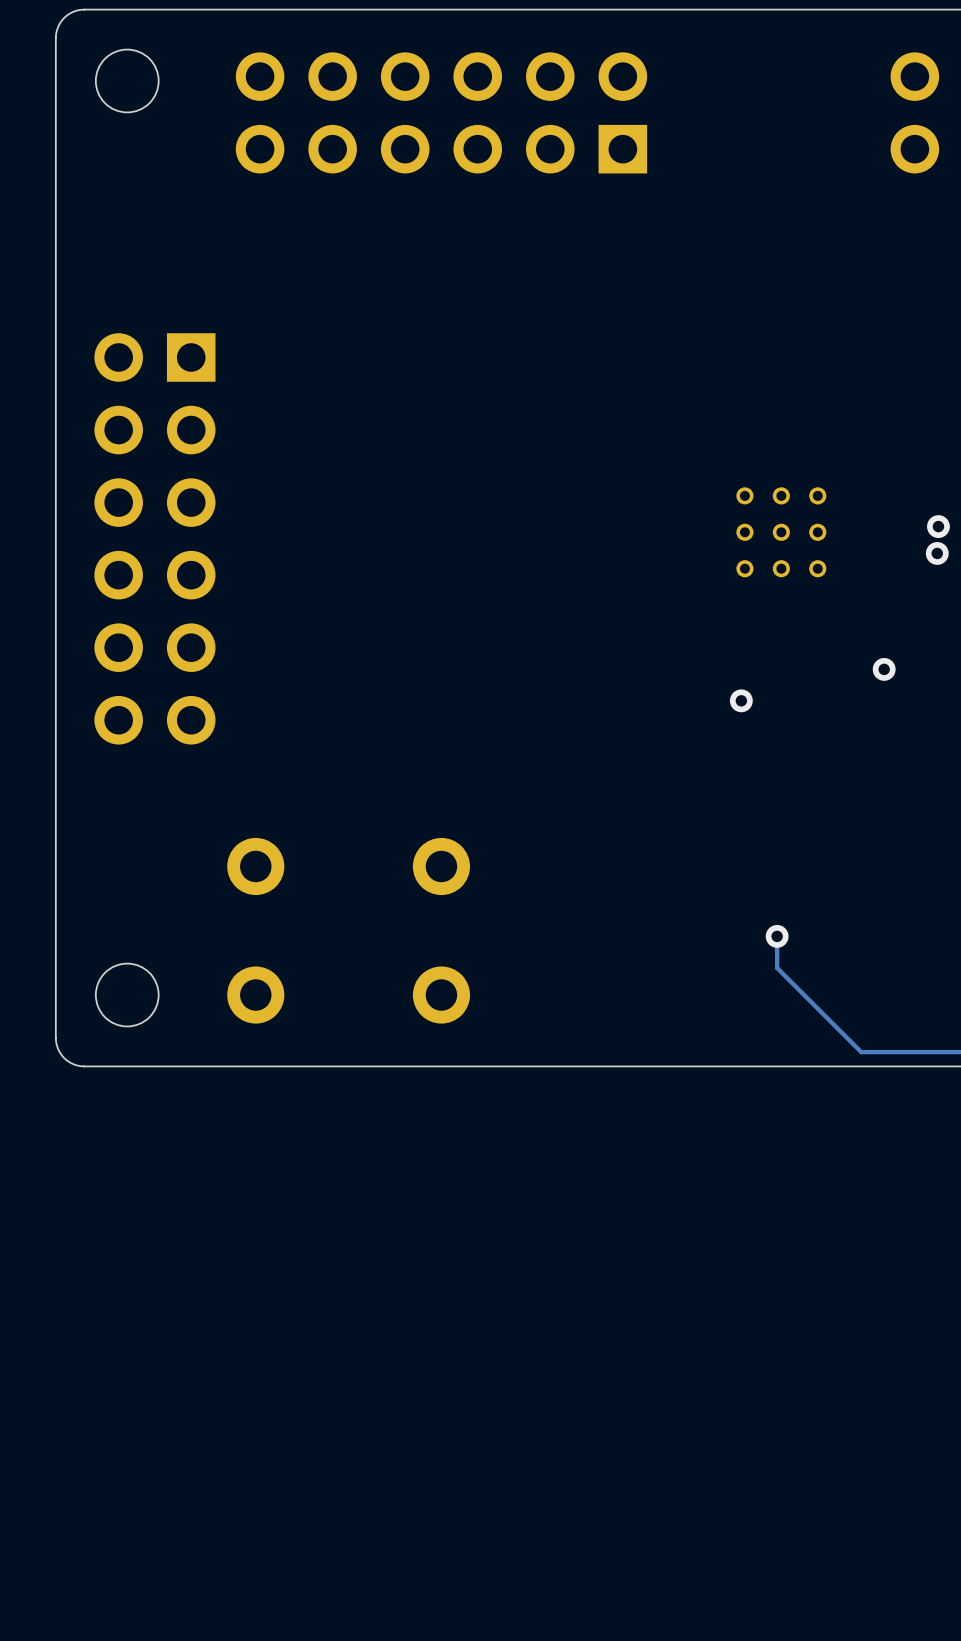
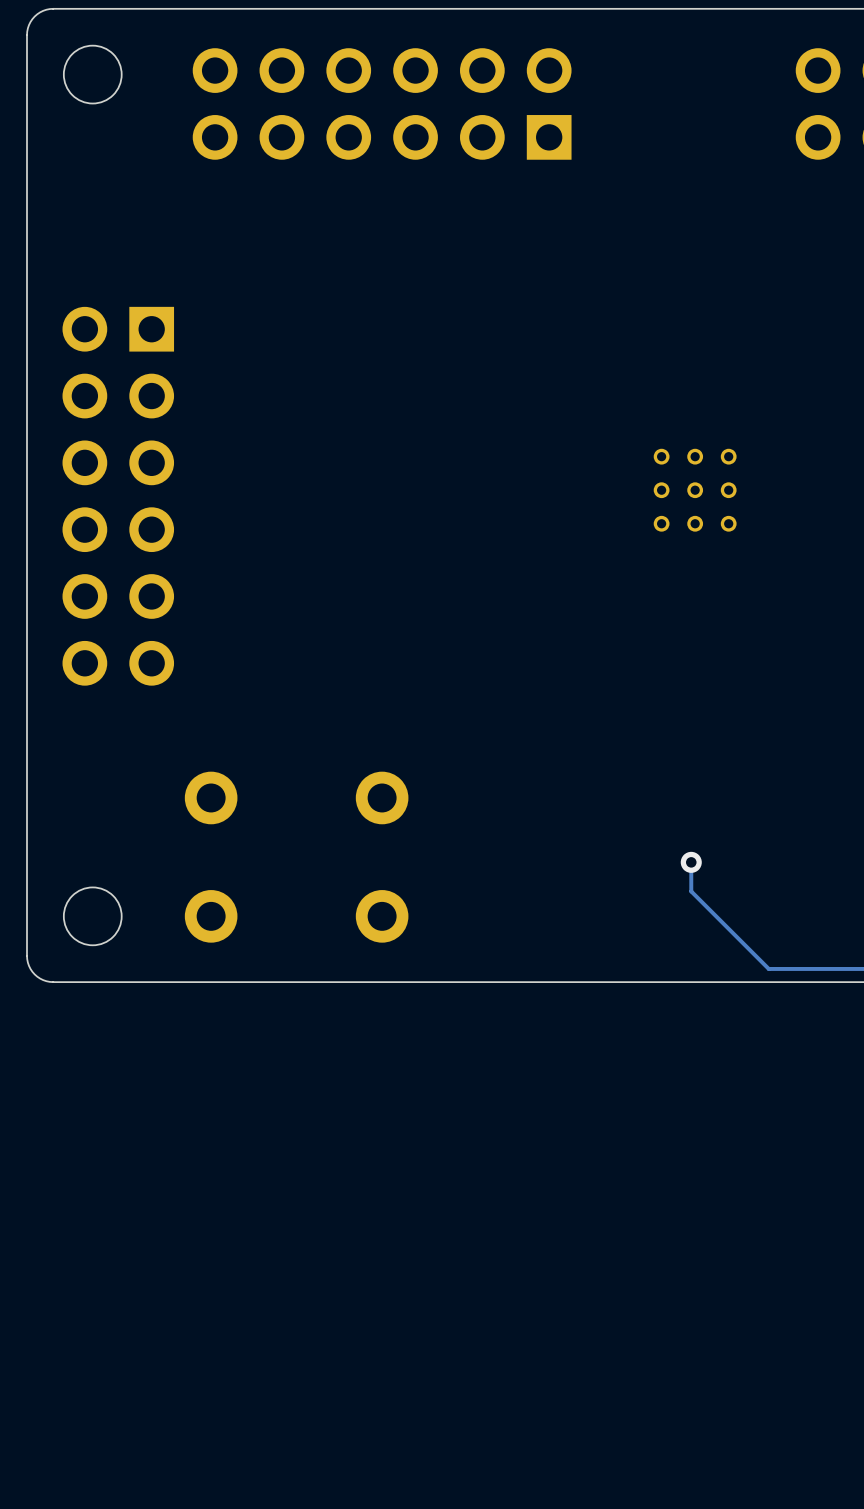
via: (938, 526) -> none
via: (937, 553) -> none
via: (884, 669) -> none
via: (741, 700) -> none

